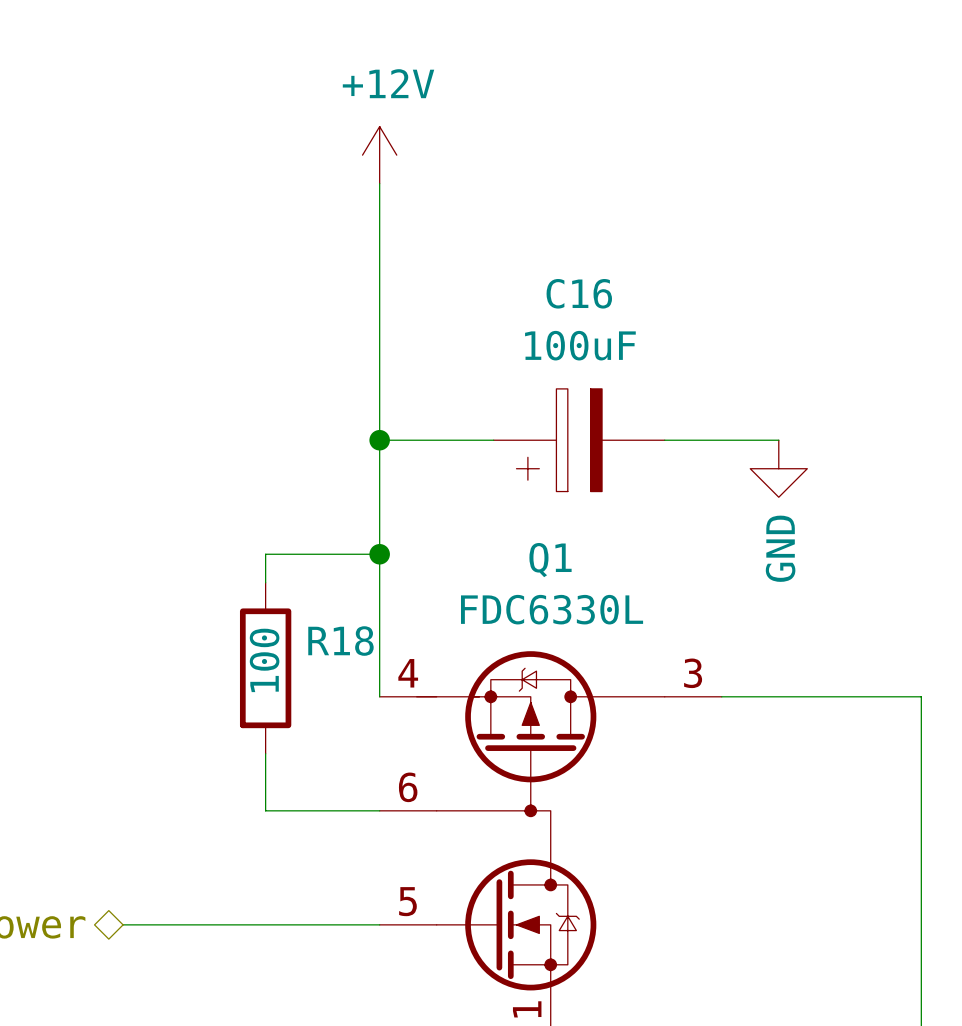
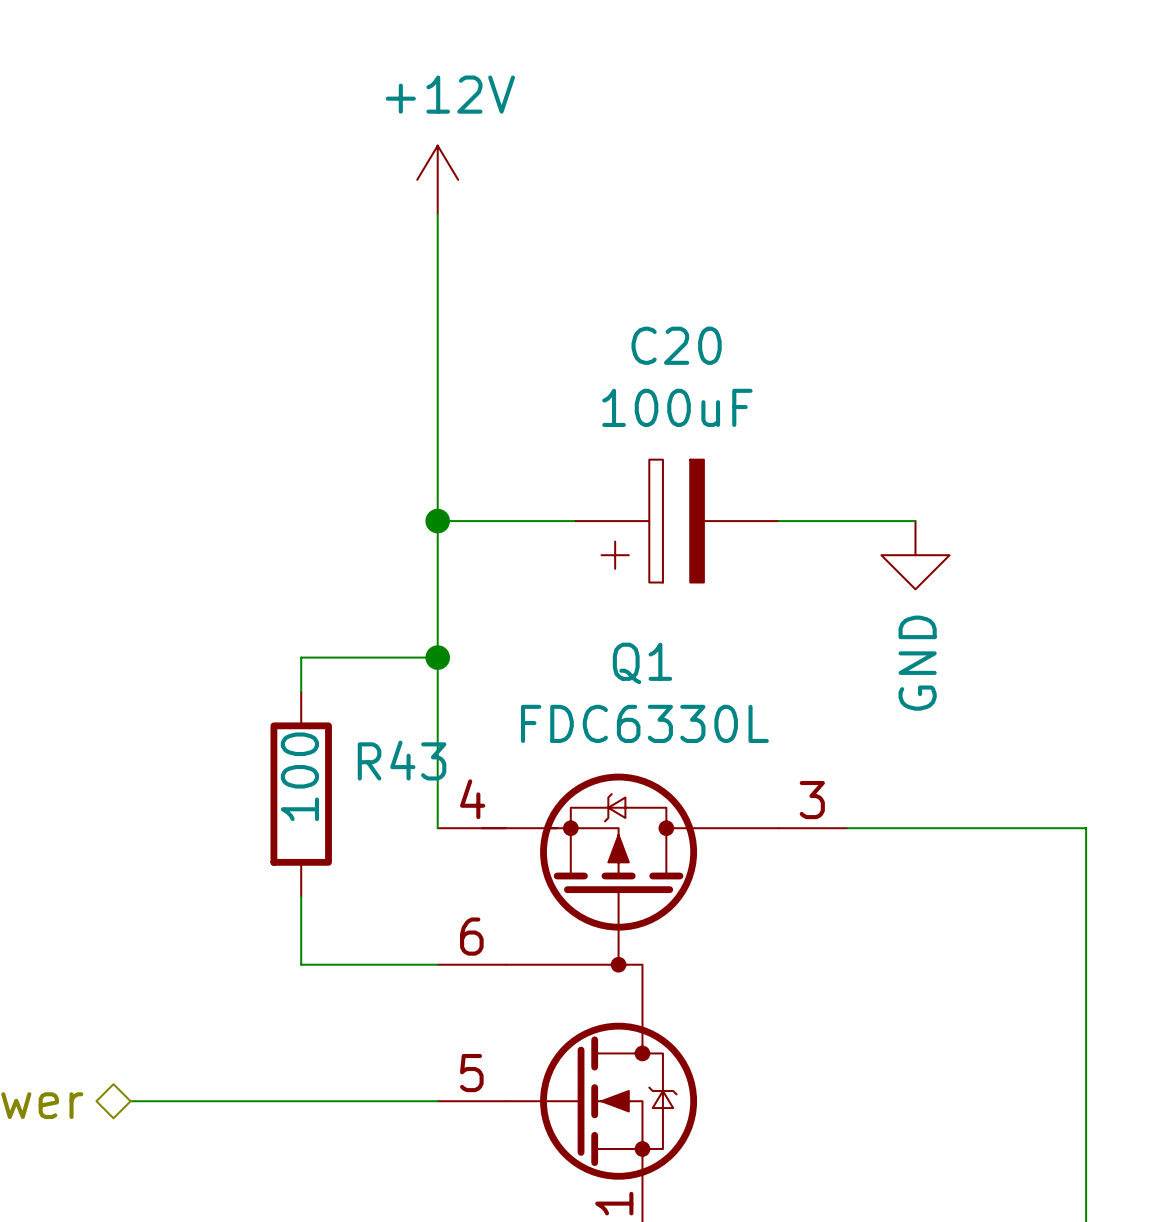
C16 name: C16 (579, 293) -> C20 (676, 345)
R18 name: R18 (340, 641) -> R43 (402, 760)

